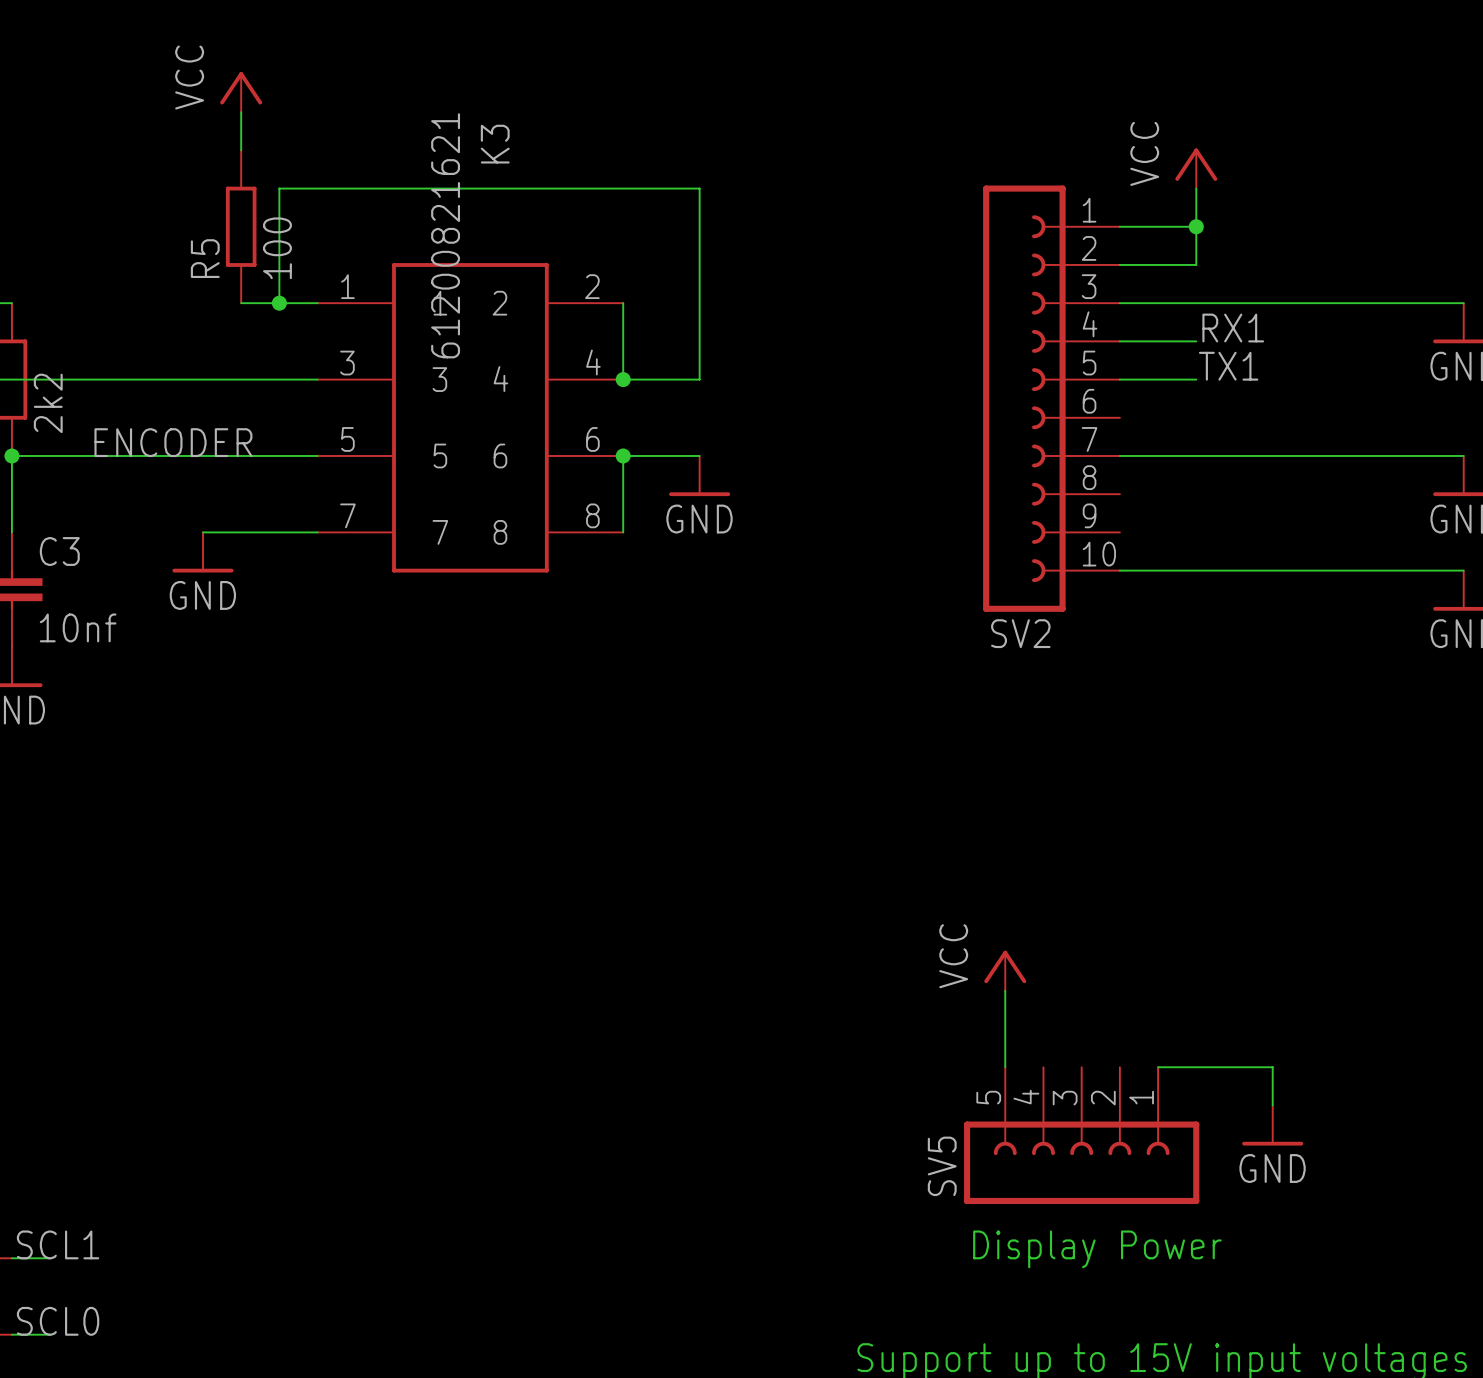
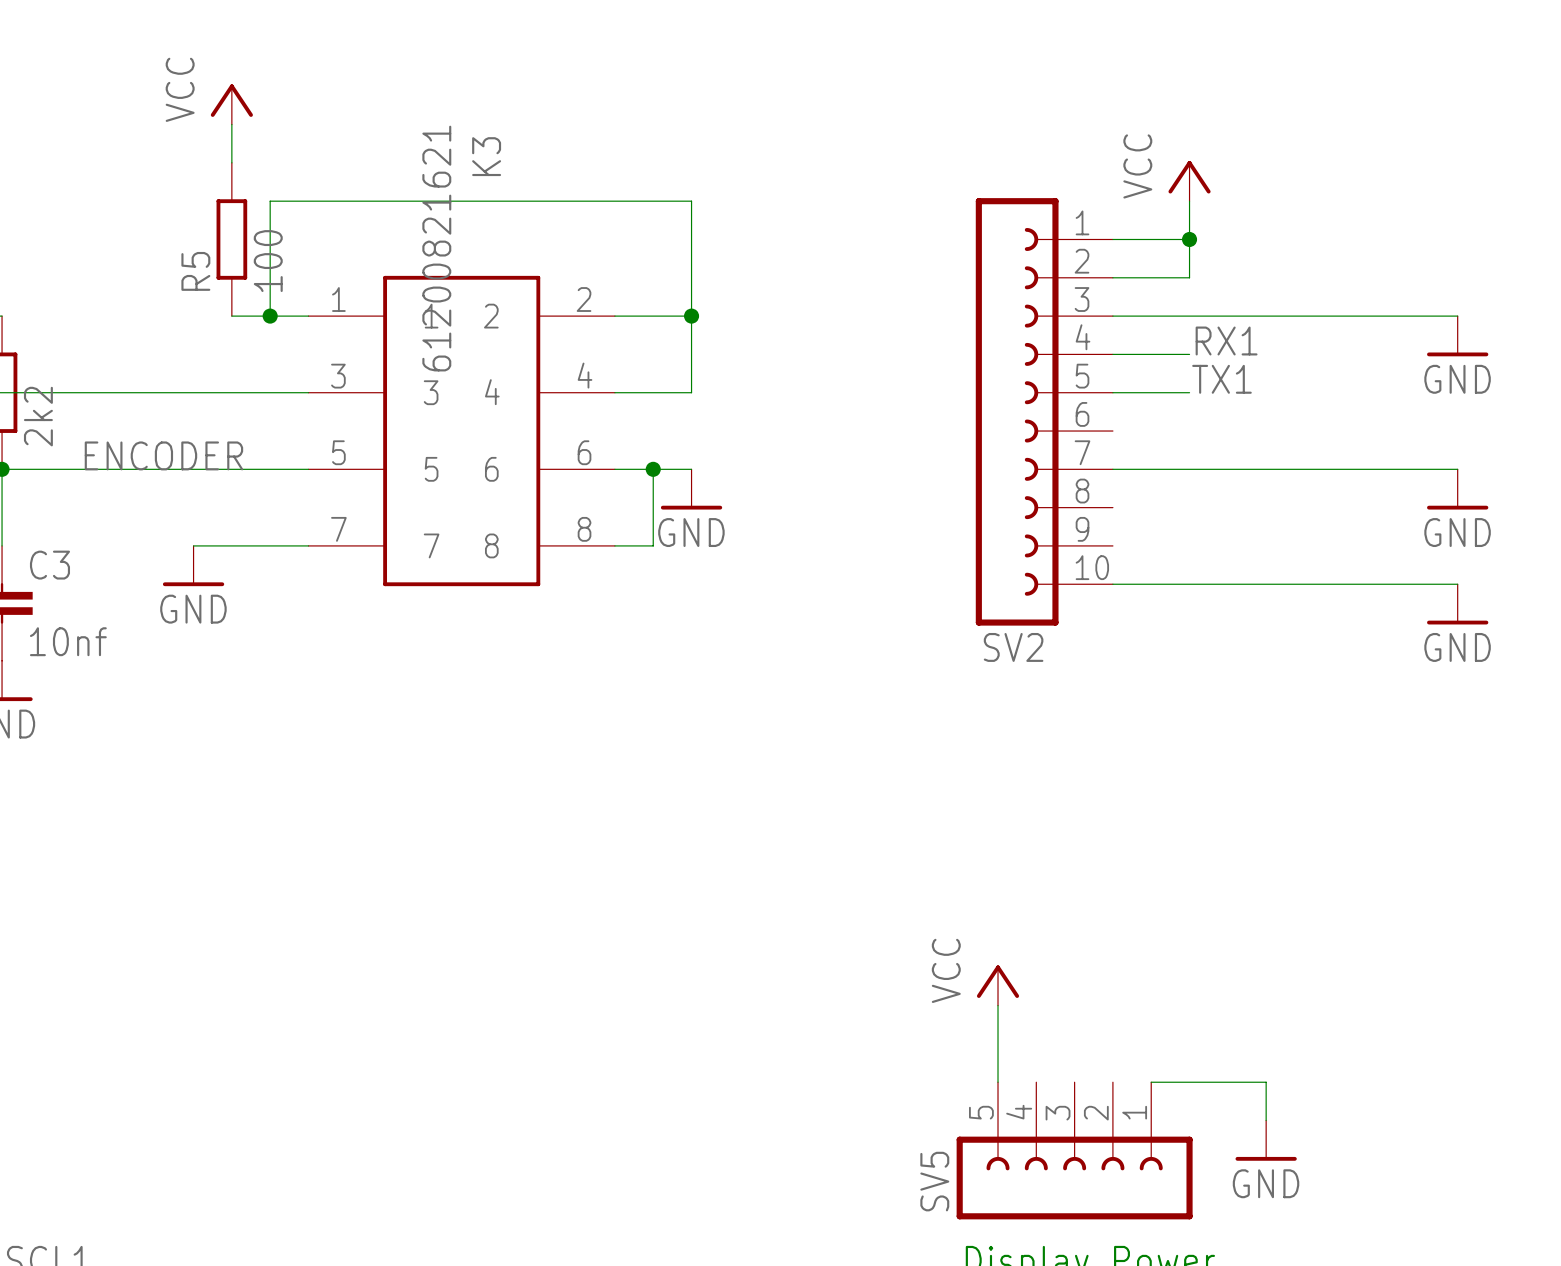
wire: (623, 303) (623, 379) -> (614, 316) (691, 316)
junction: none -> (691, 316)
junction: (623, 379) -> none
wire: (623, 455) (623, 532) -> (653, 469) (653, 545) (614, 545)
junction position: (623, 455) -> (653, 469)

